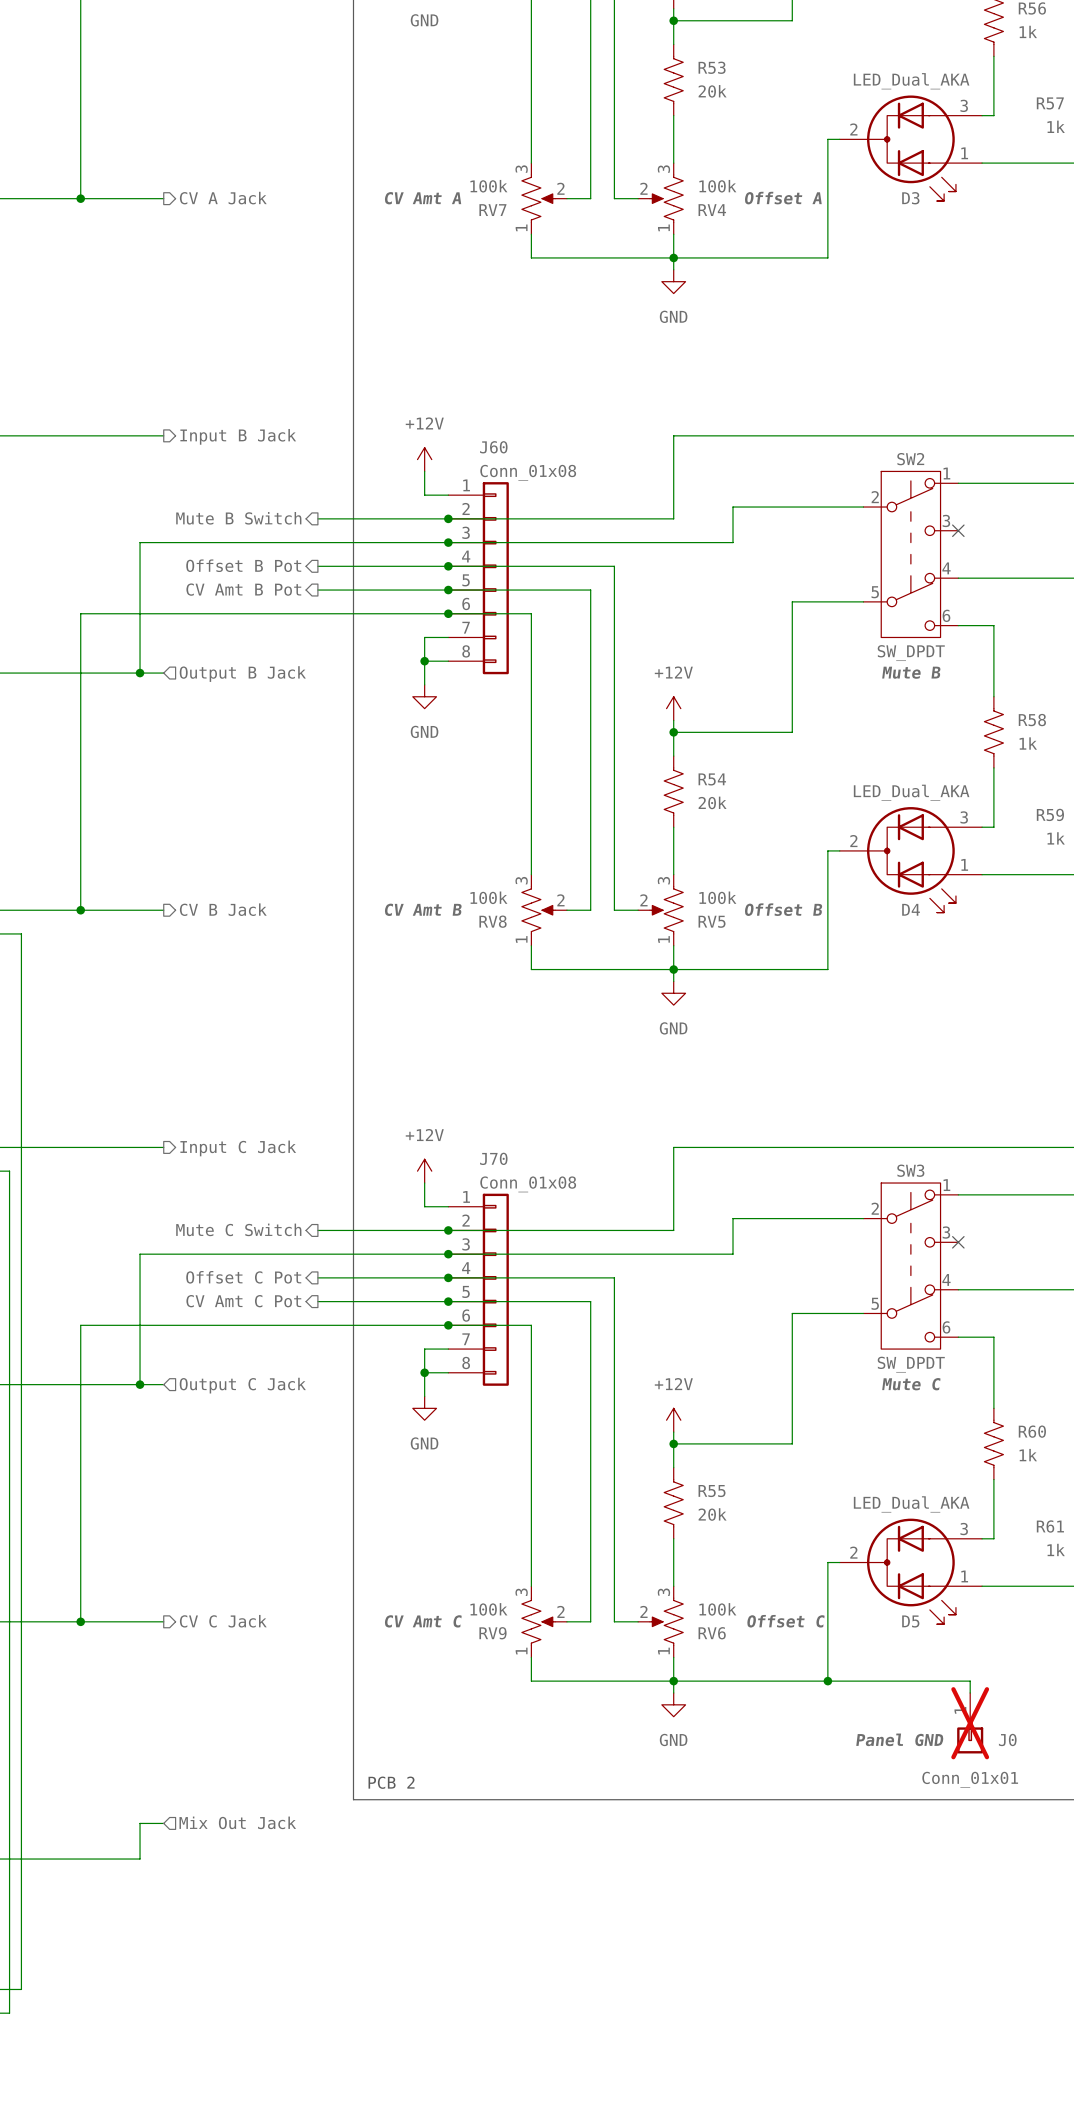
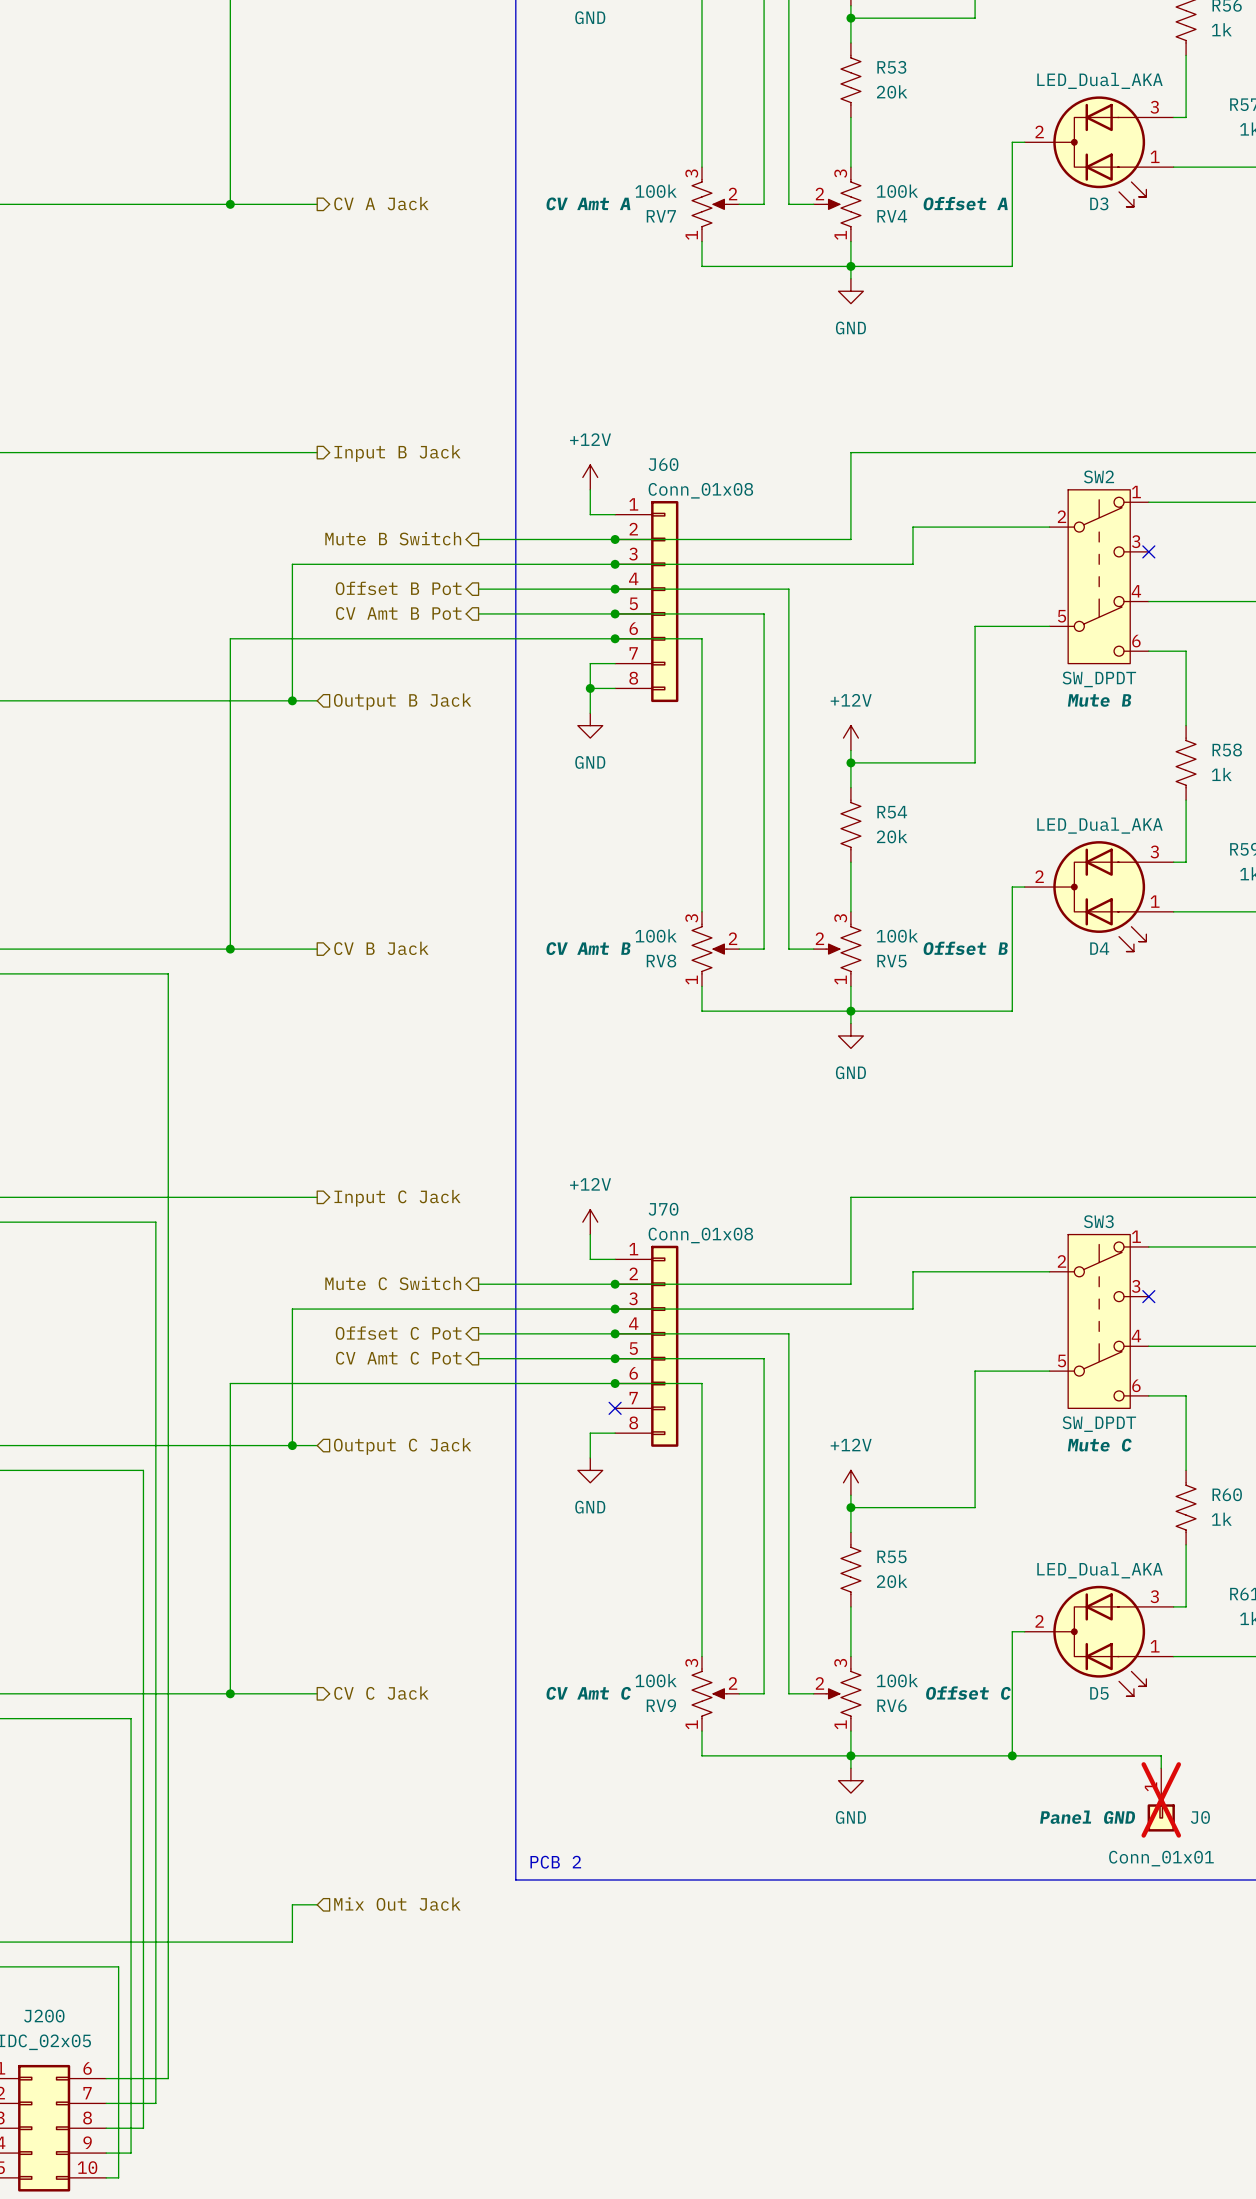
wire: (448, 1349) (424, 1349) (424, 1372) -> none
no-connect mark: none -> (615, 1408)
junction: (424, 1372) -> none

